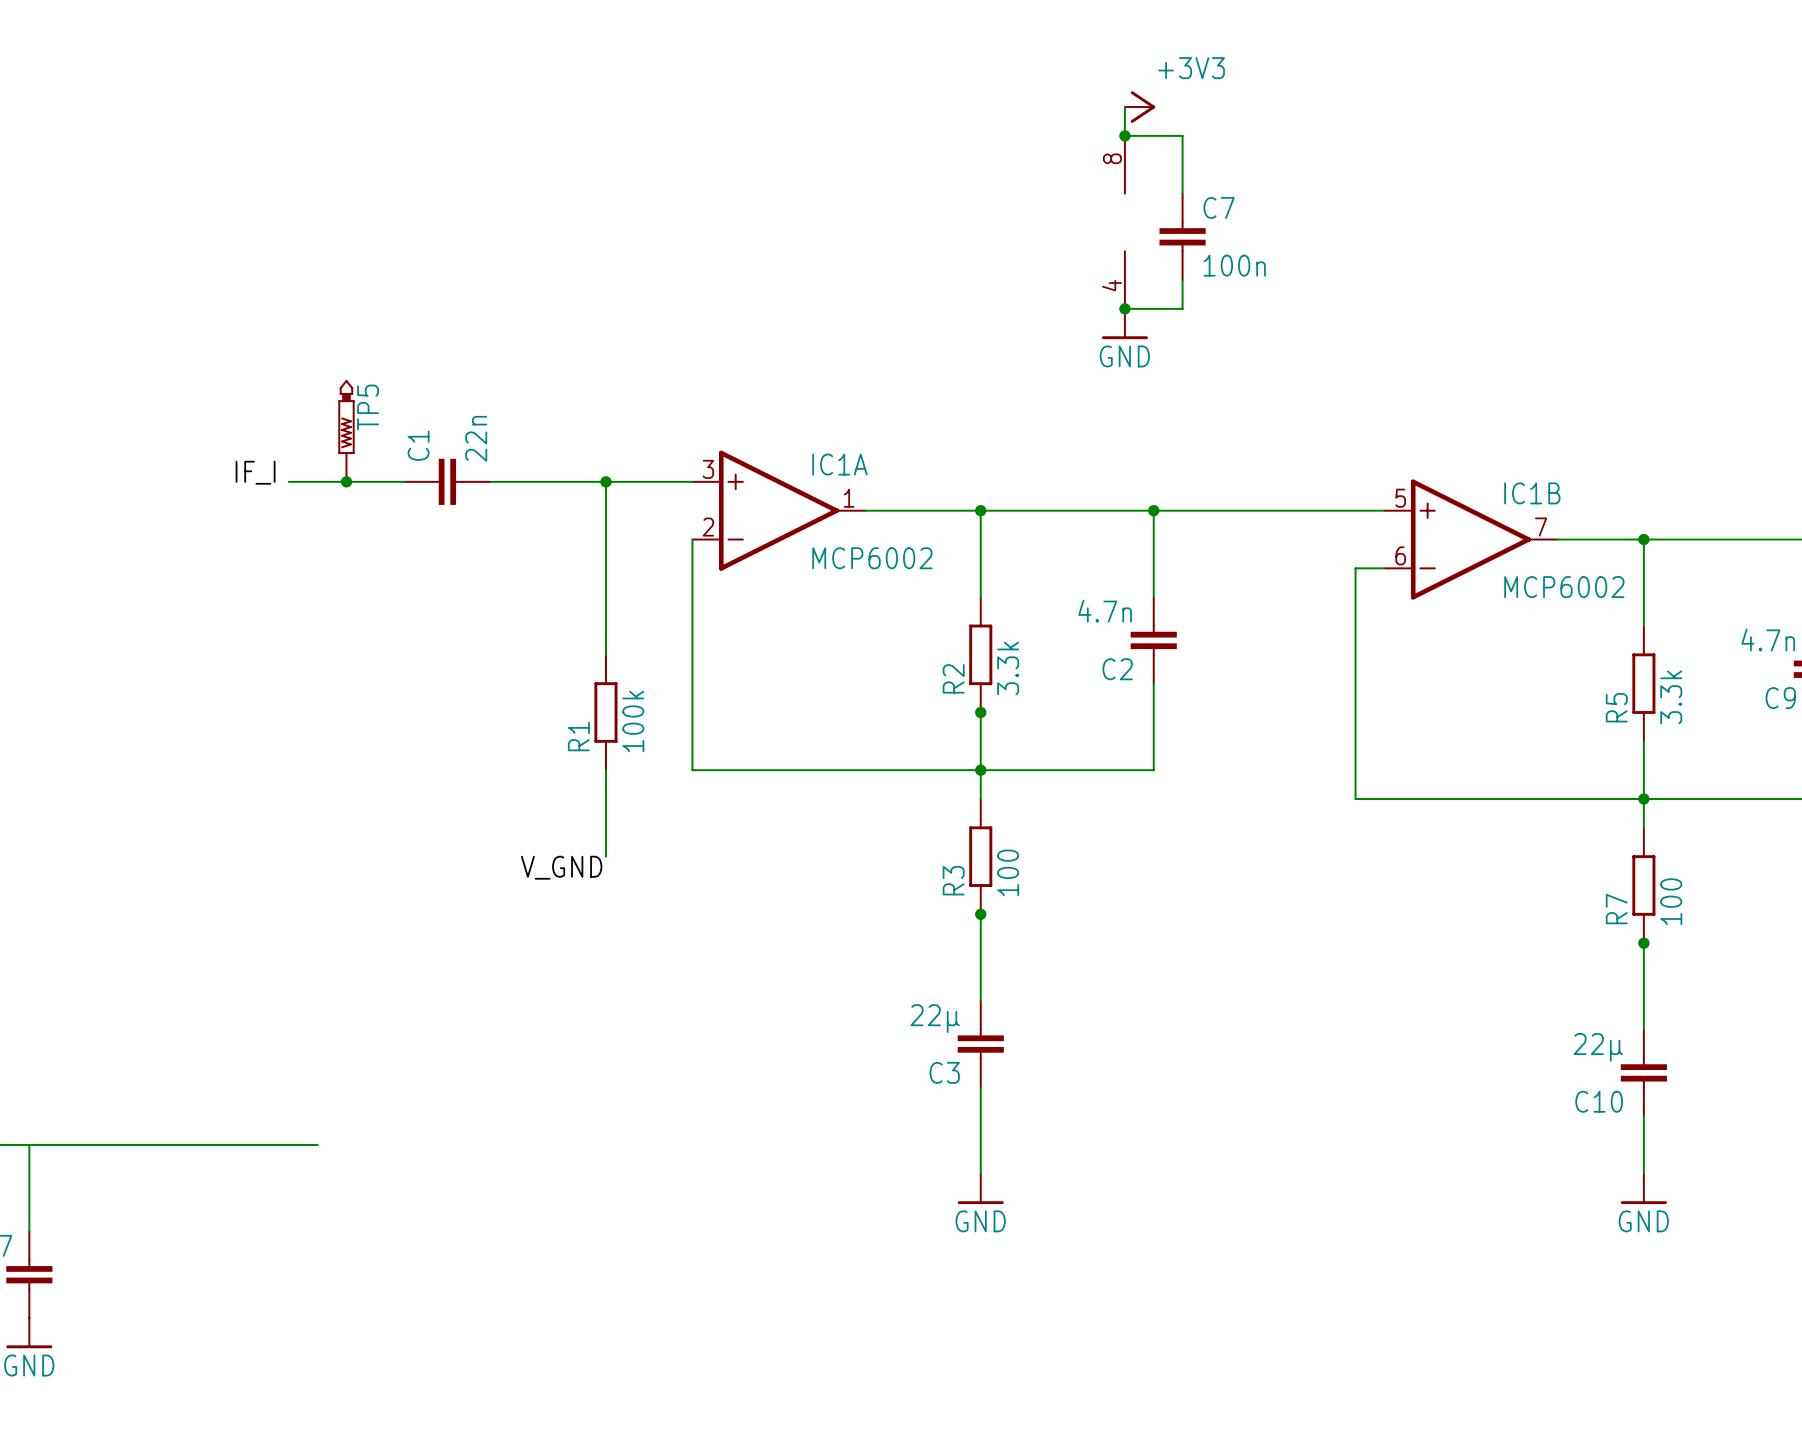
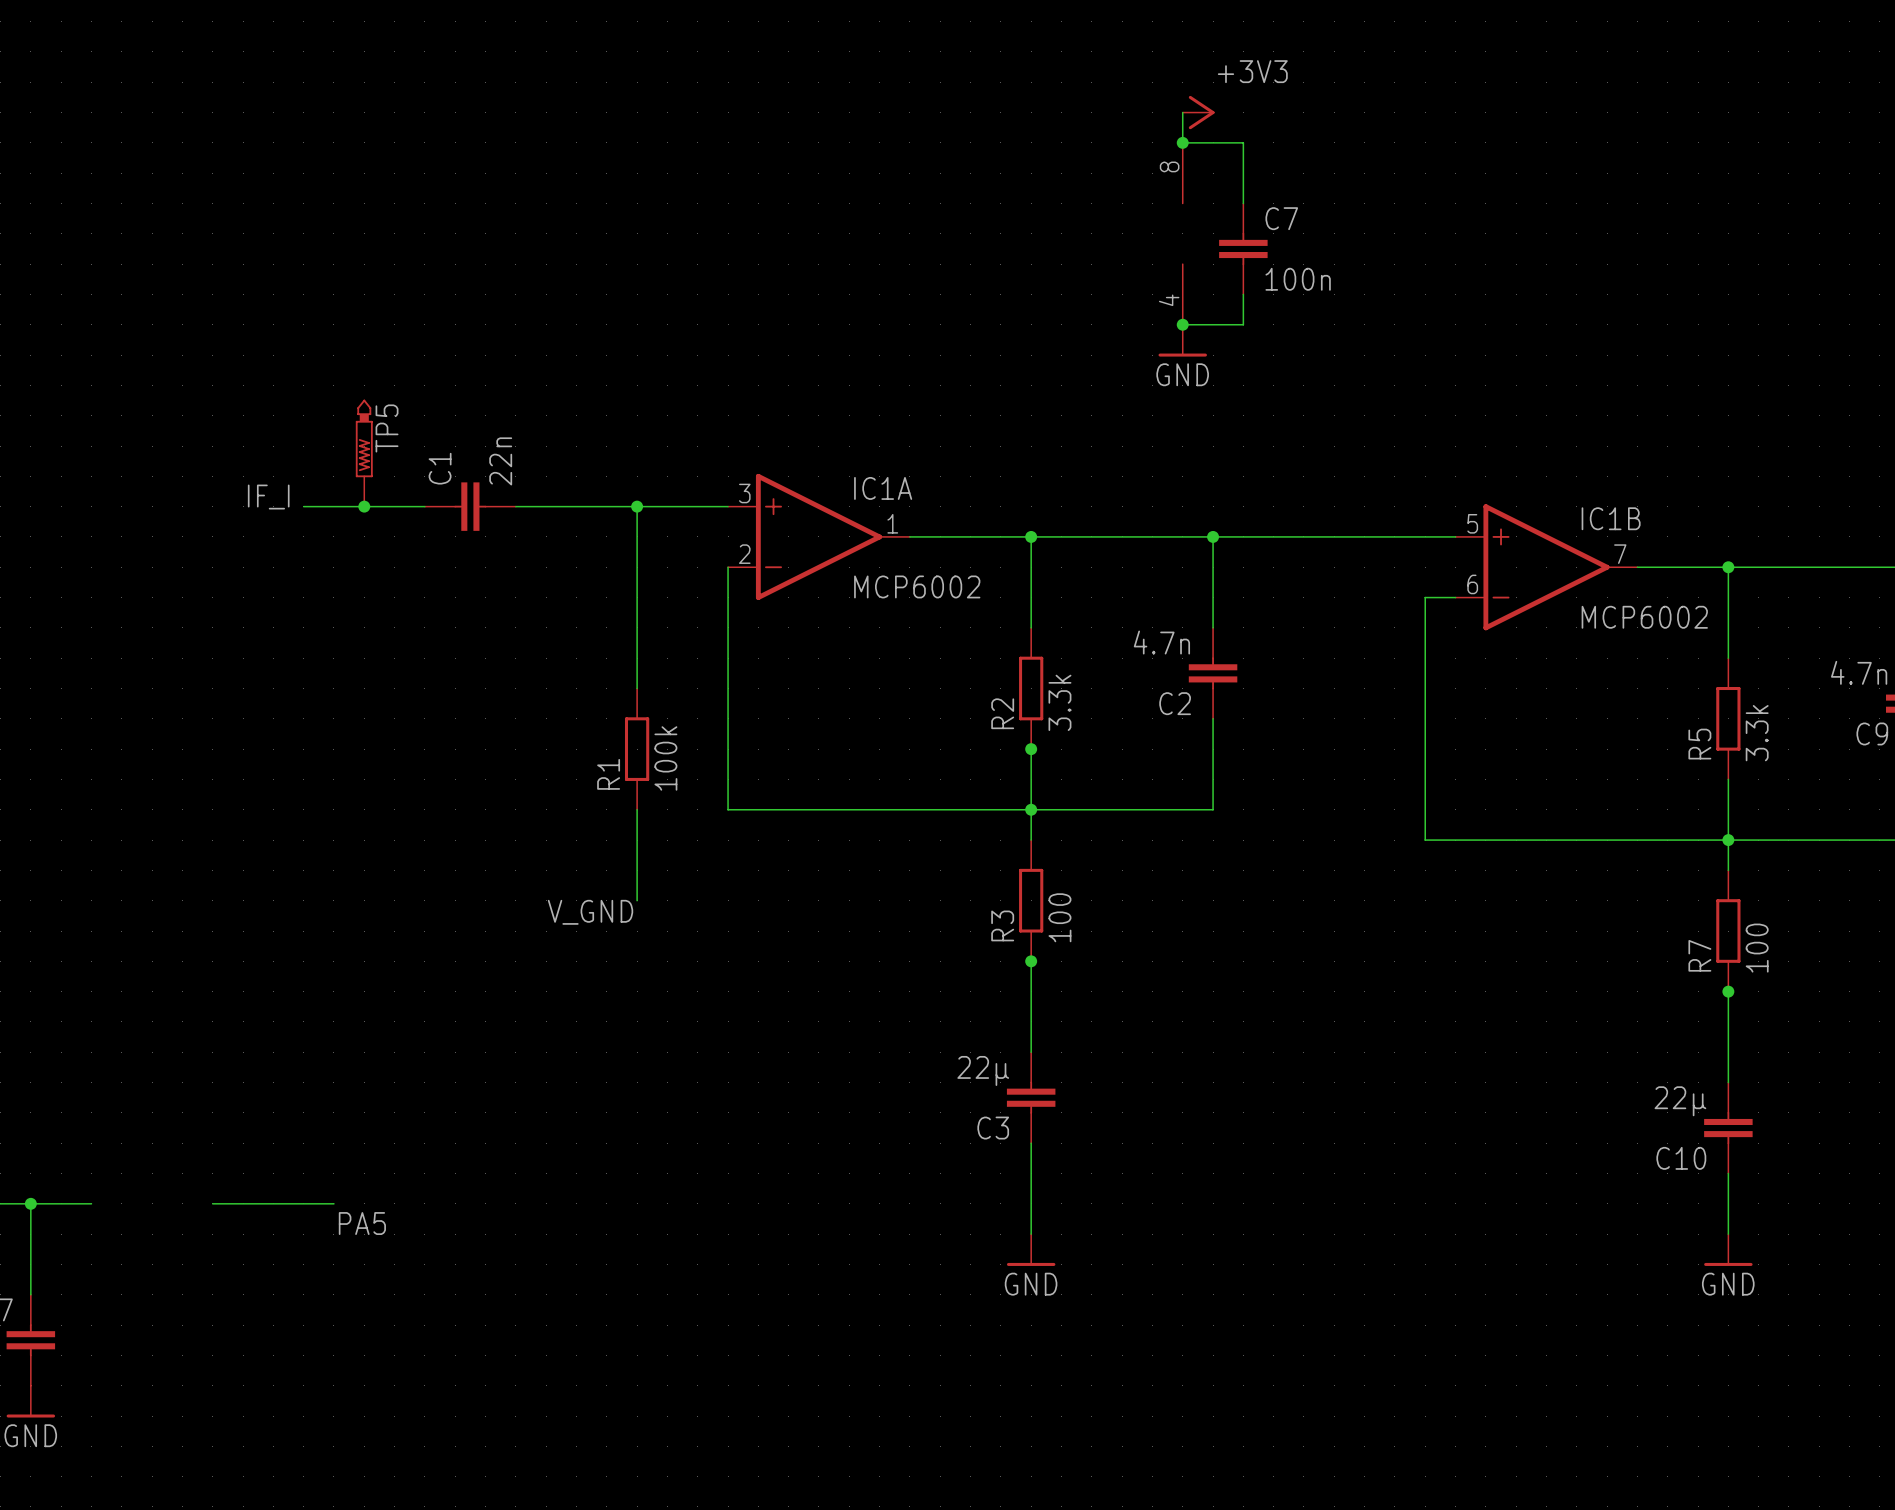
junction: none -> (30, 1203)
wire: (87, 1144) (202, 1144) -> none
label: none -> PA5 (362, 1223)

